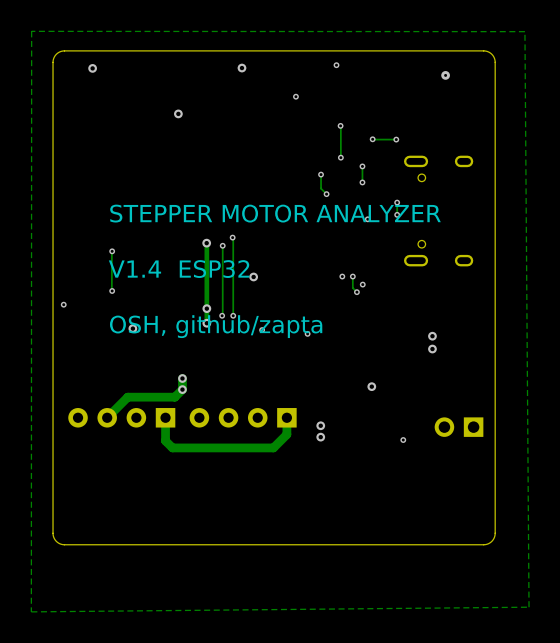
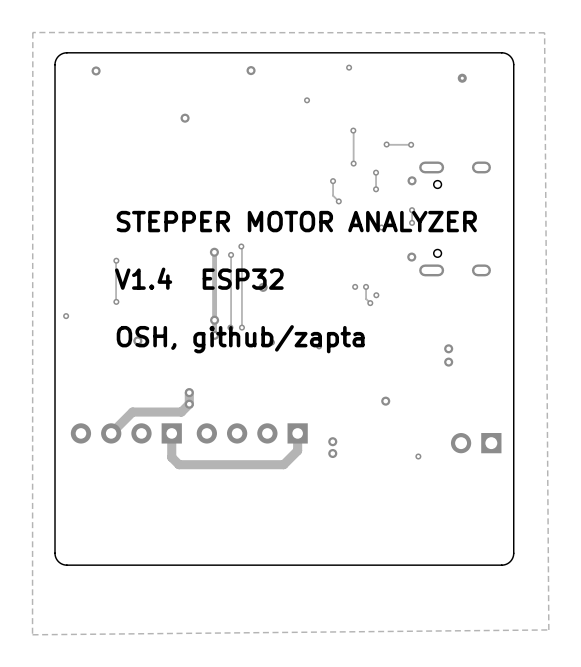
via: none -> (412, 180)
via: none -> (411, 257)

